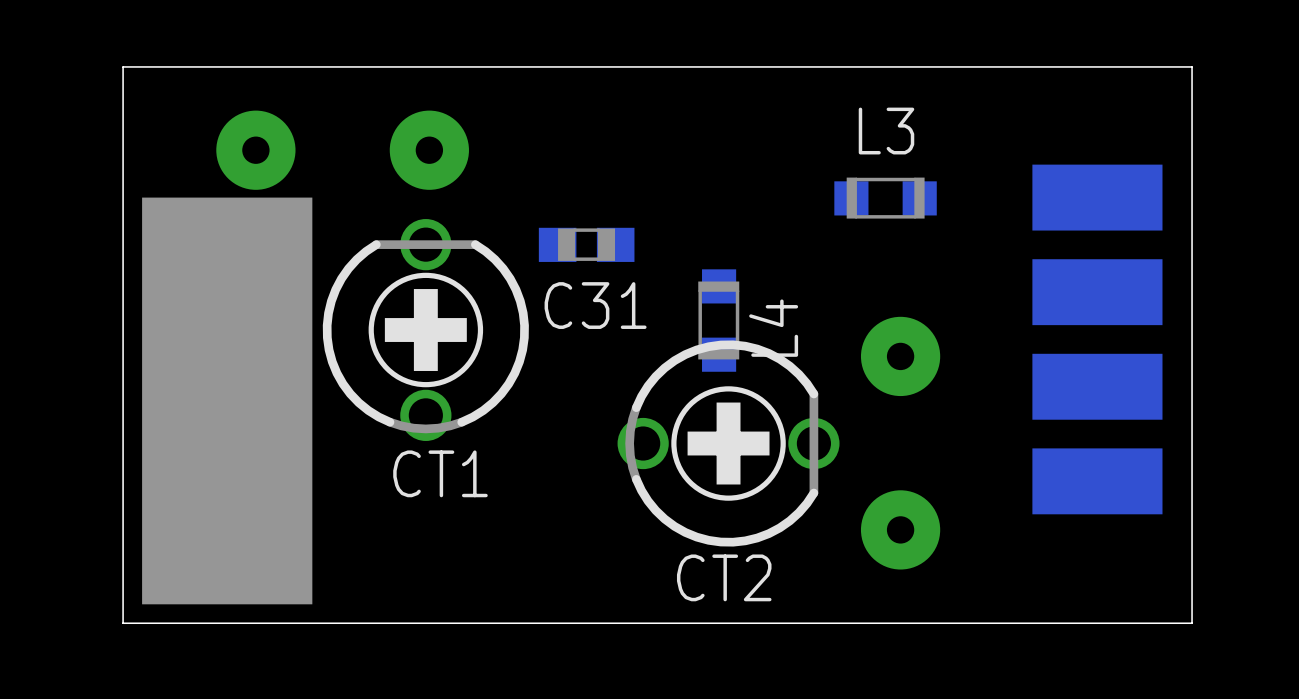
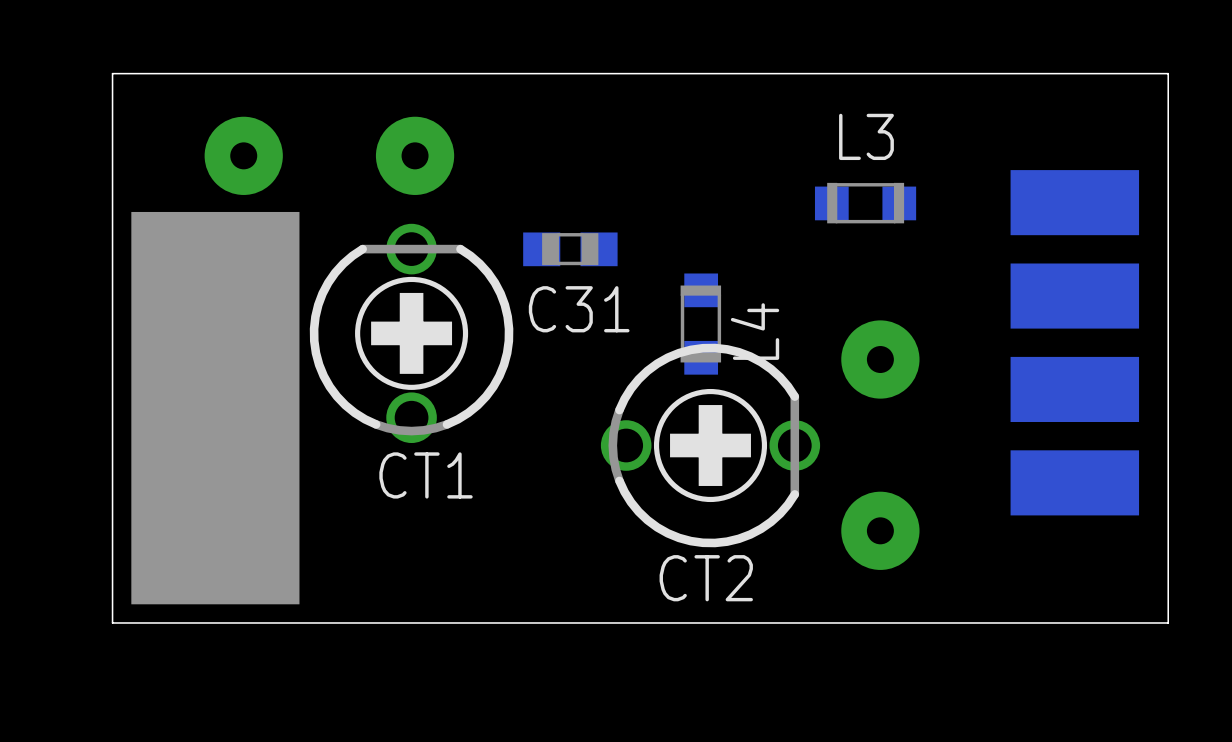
drawing shape: [142, 197, 313, 605] -> [131, 211, 300, 605]

